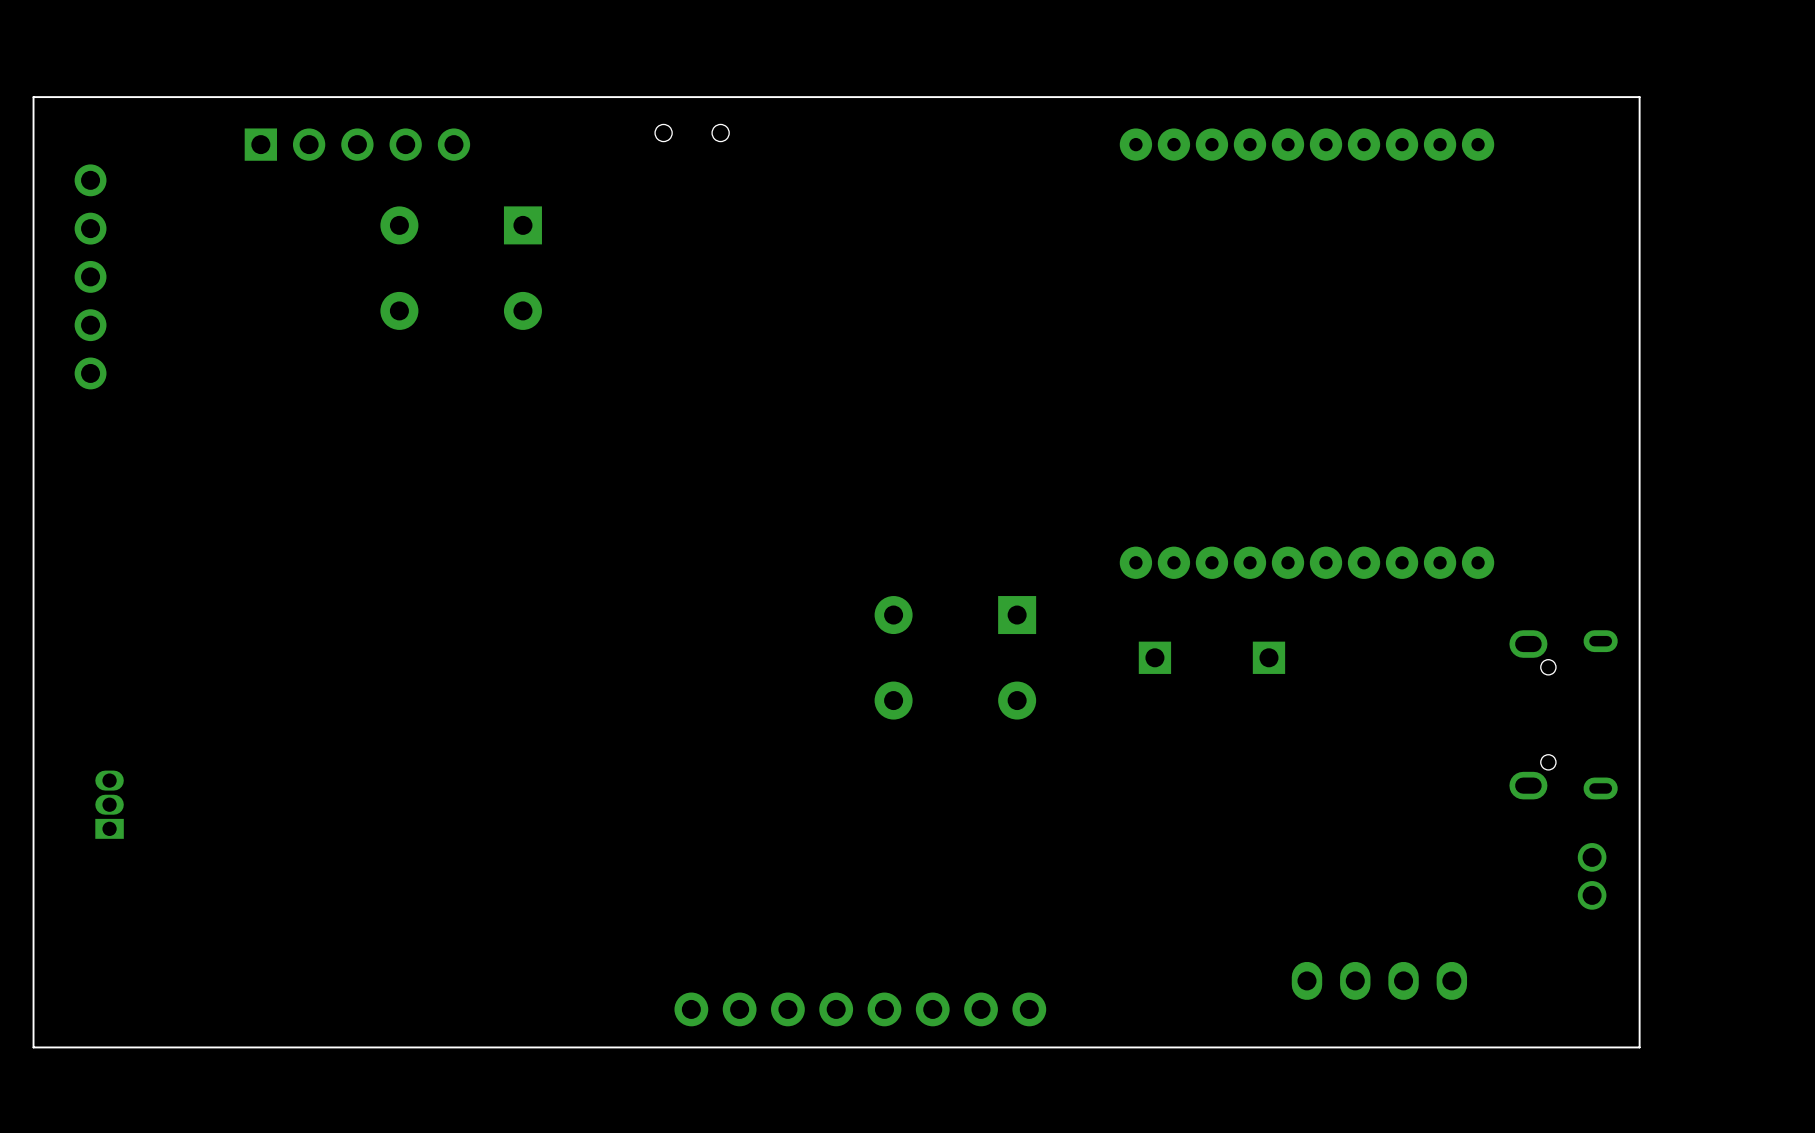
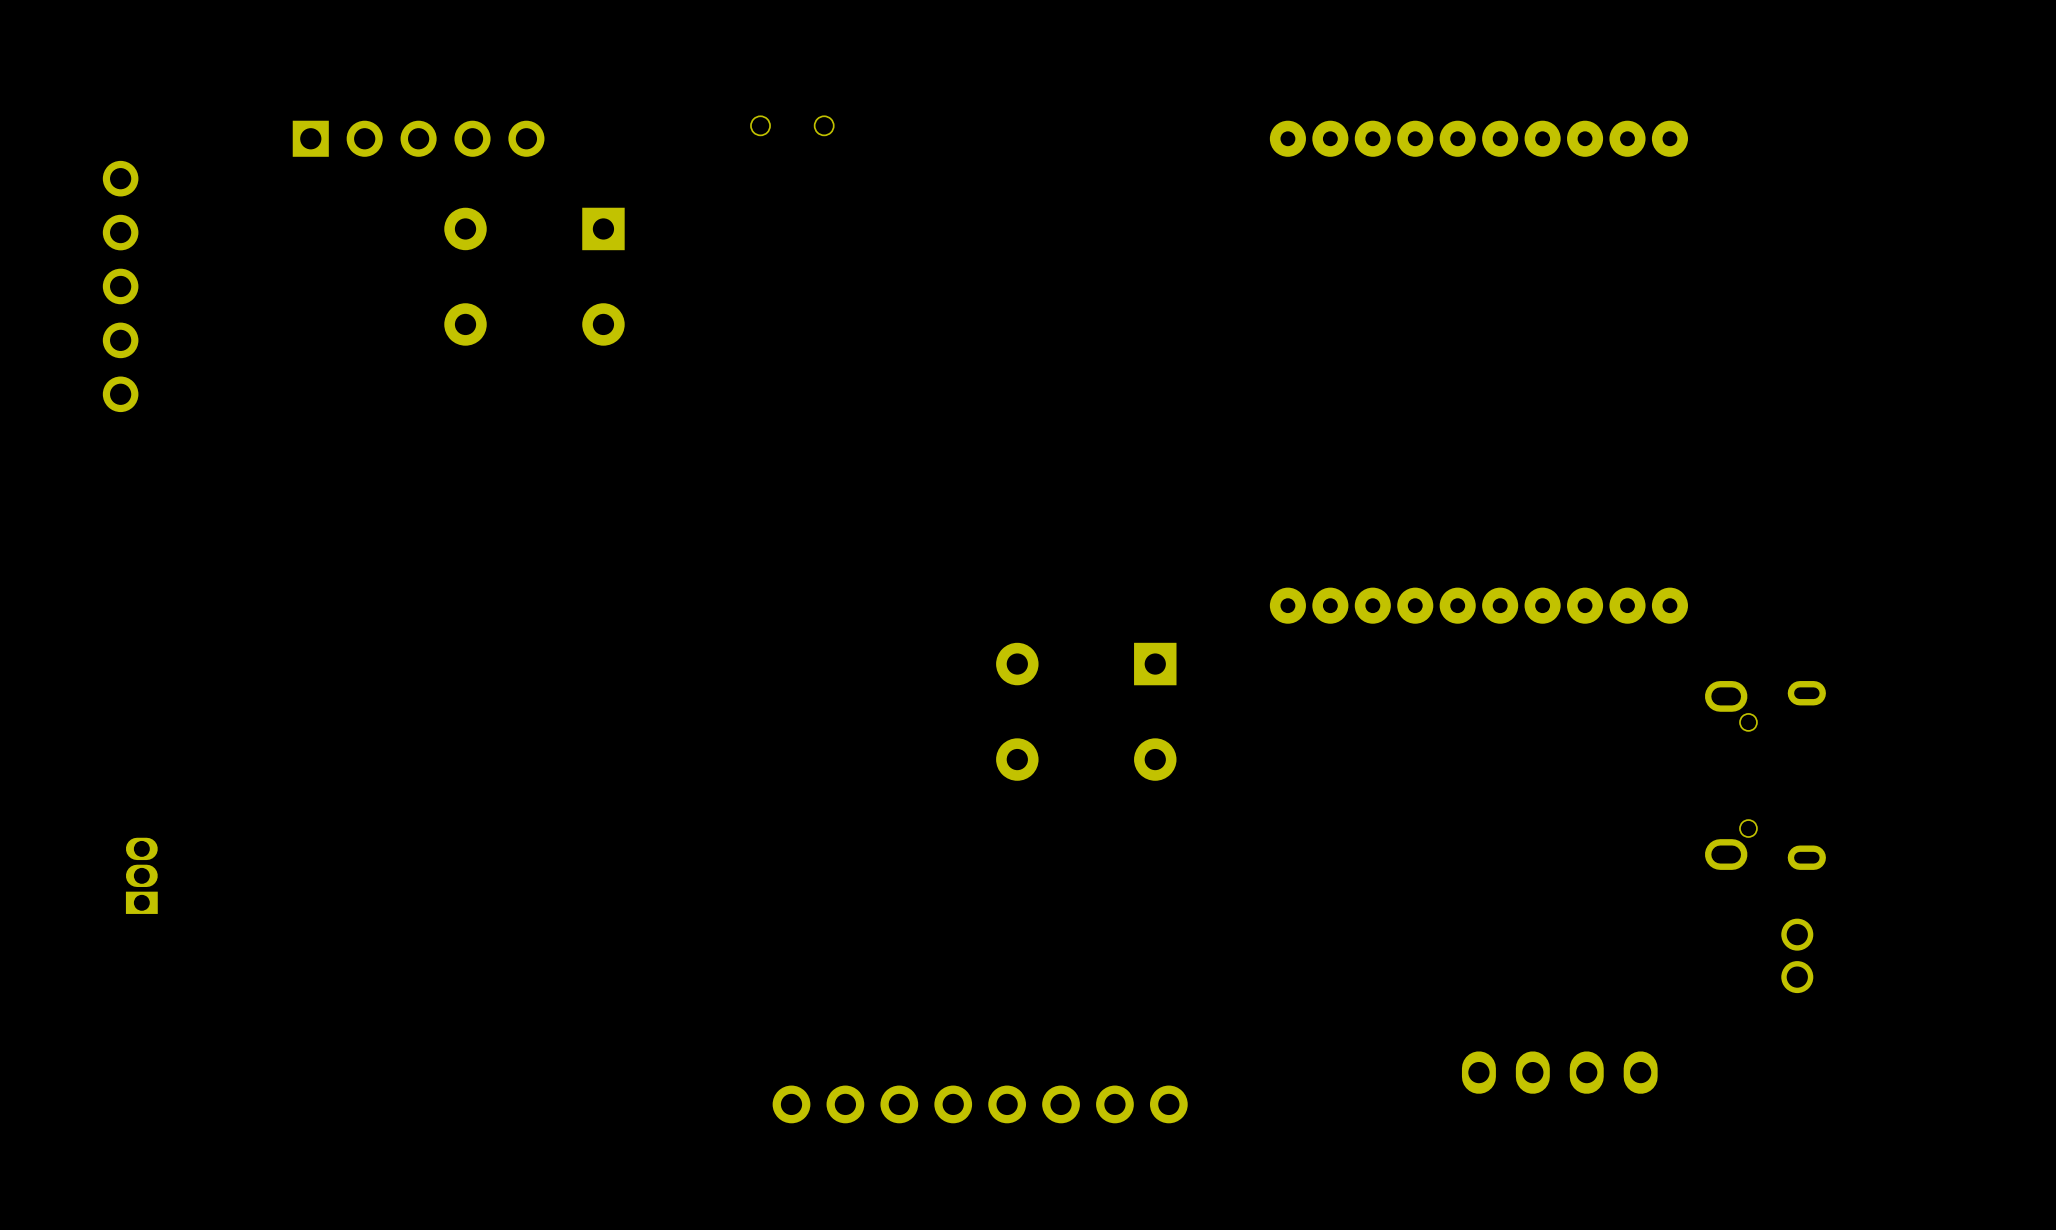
board edge: (1639, 97) (33, 97) (33, 1047) (1639, 1047) (1639, 97) -> none
part: (1154, 657) -> none
part: (1268, 657) -> none

